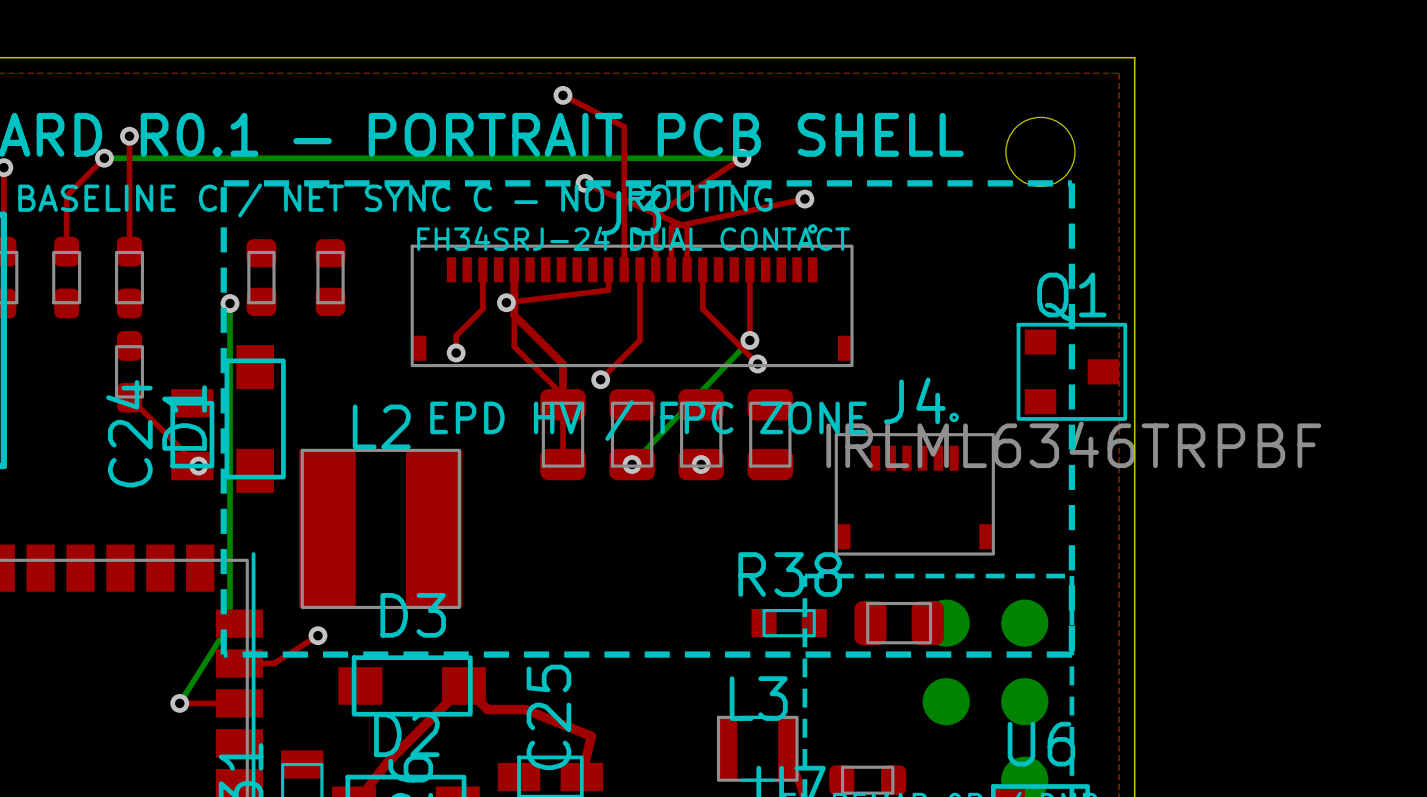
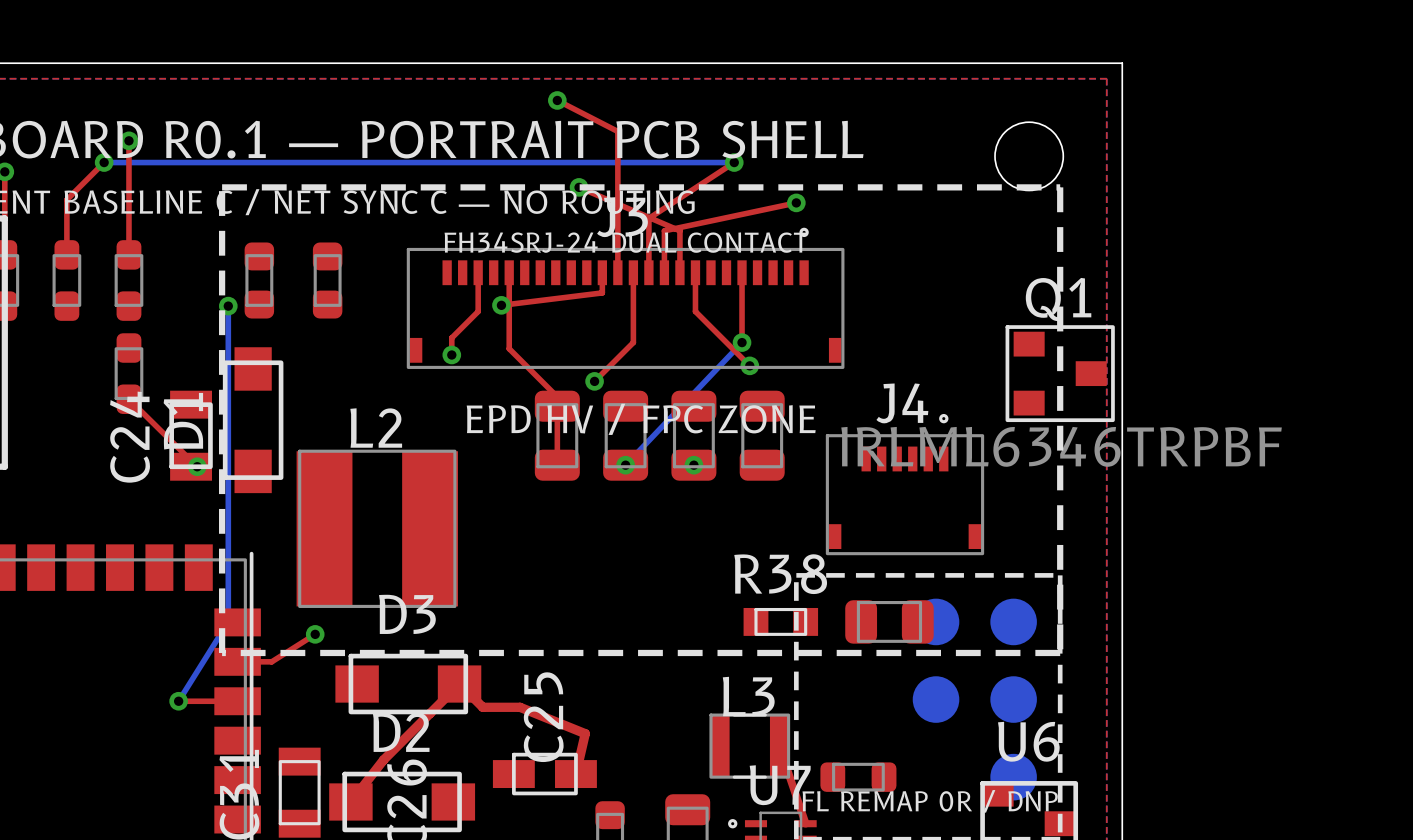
top track: (514, 269) (514, 315) (563, 363) (563, 404) -> none

